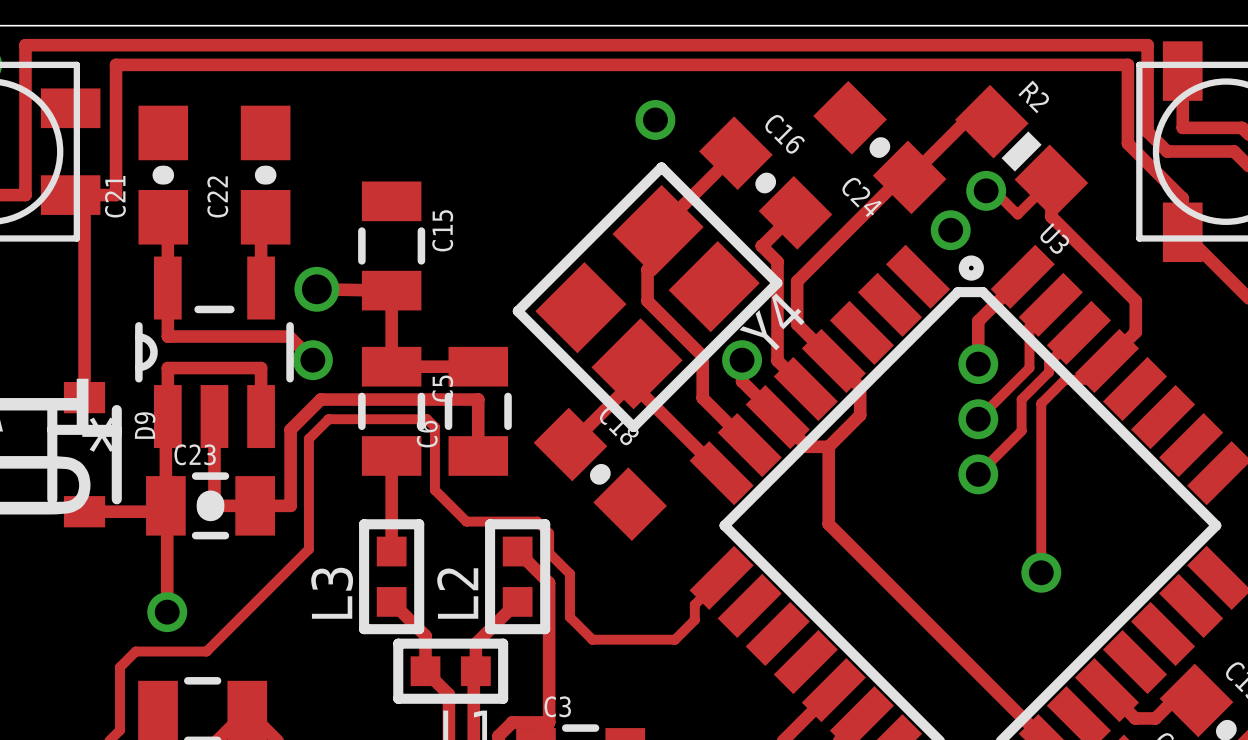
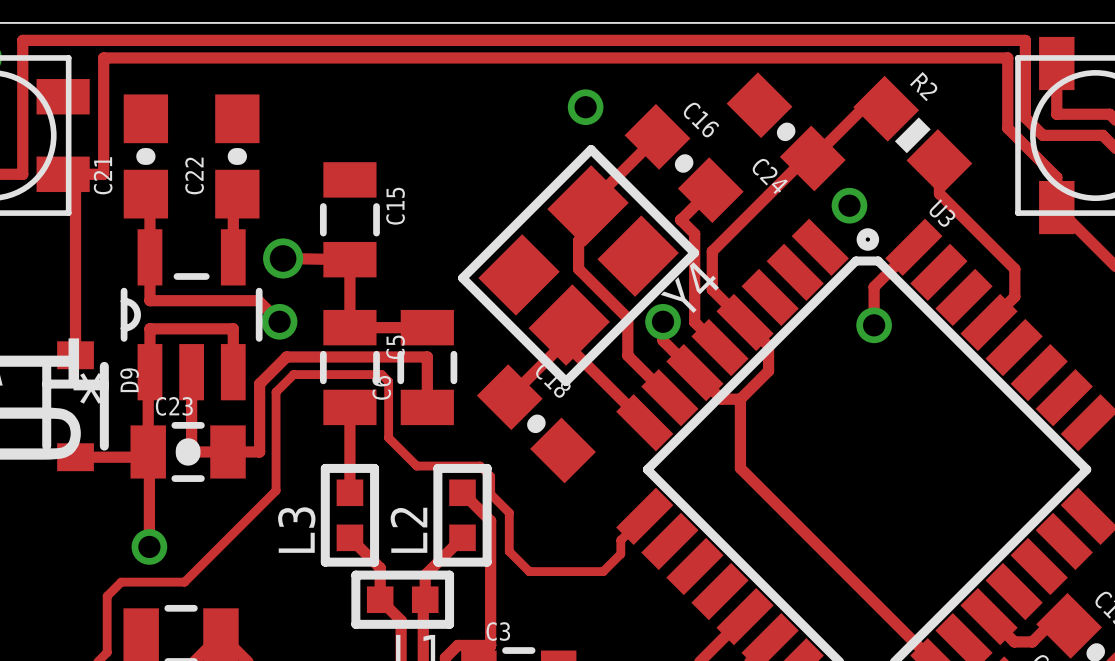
track: (1050, 181) (1017, 214) (994, 190) (986, 190) -> none
via: (986, 190) -> none
track: (1050, 304) (1029, 326) (1029, 368) (978, 419) -> none
track: (1078, 332) (1049, 362) (1049, 371) (1021, 399) (1021, 431) (978, 474) -> none
track: (1106, 360) (1088, 379) (1064, 379) (1041, 403) (1041, 572) -> none
via: (978, 419) -> none
via: (978, 474) -> none
via: (1041, 572) -> none

